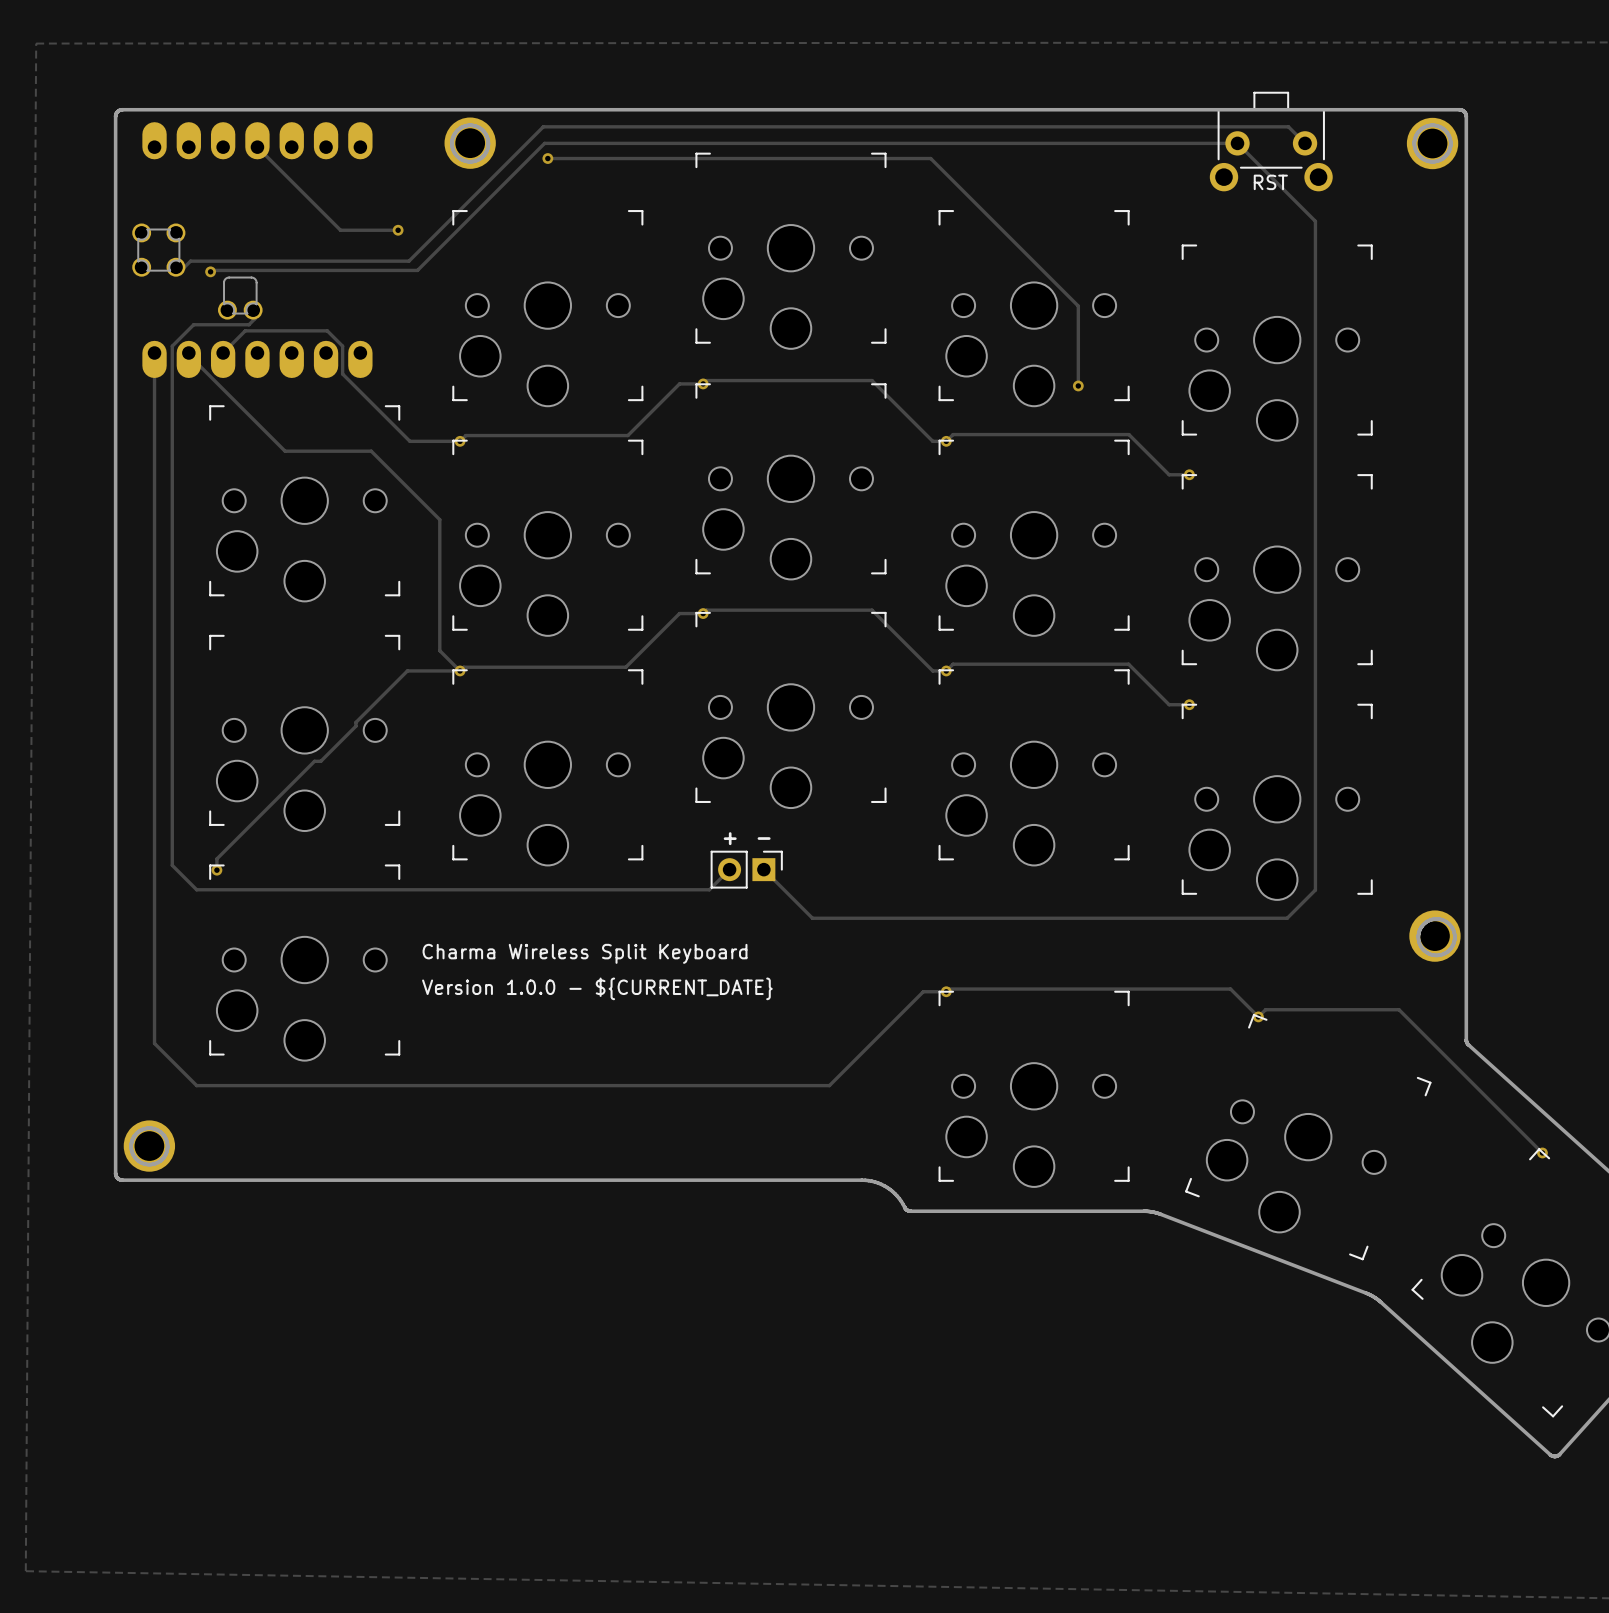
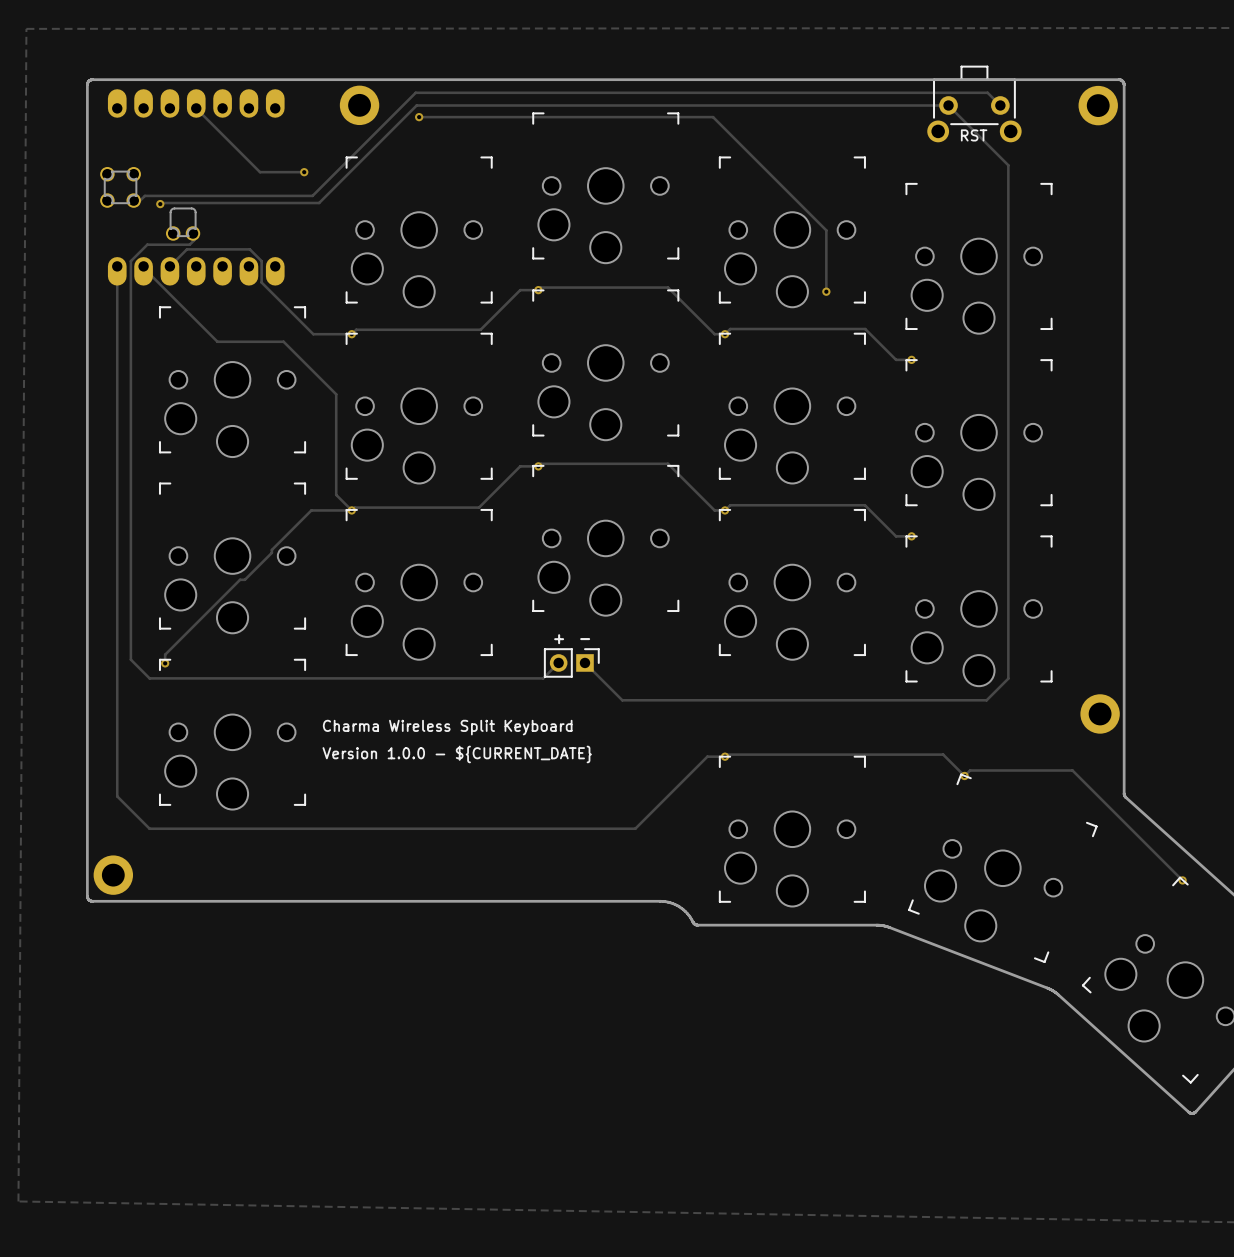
board edge: (469, 125) (456, 131) (451, 144) (458, 157) (471, 161) (483, 155) (488, 142) (482, 129) (469, 125) -> none
board edge: (1431, 125) (1418, 131) (1414, 144) (1420, 157) (1433, 161) (1446, 155) (1450, 142) (1444, 129) (1431, 125) -> none
board edge: (1435, 919) (1422, 925) (1418, 938) (1424, 950) (1437, 955) (1450, 949) (1454, 935) (1448, 923) (1435, 919) -> none
board edge: (148, 1128) (135, 1134) (131, 1147) (137, 1160) (150, 1164) (163, 1158) (167, 1145) (161, 1132) (148, 1128) -> none

